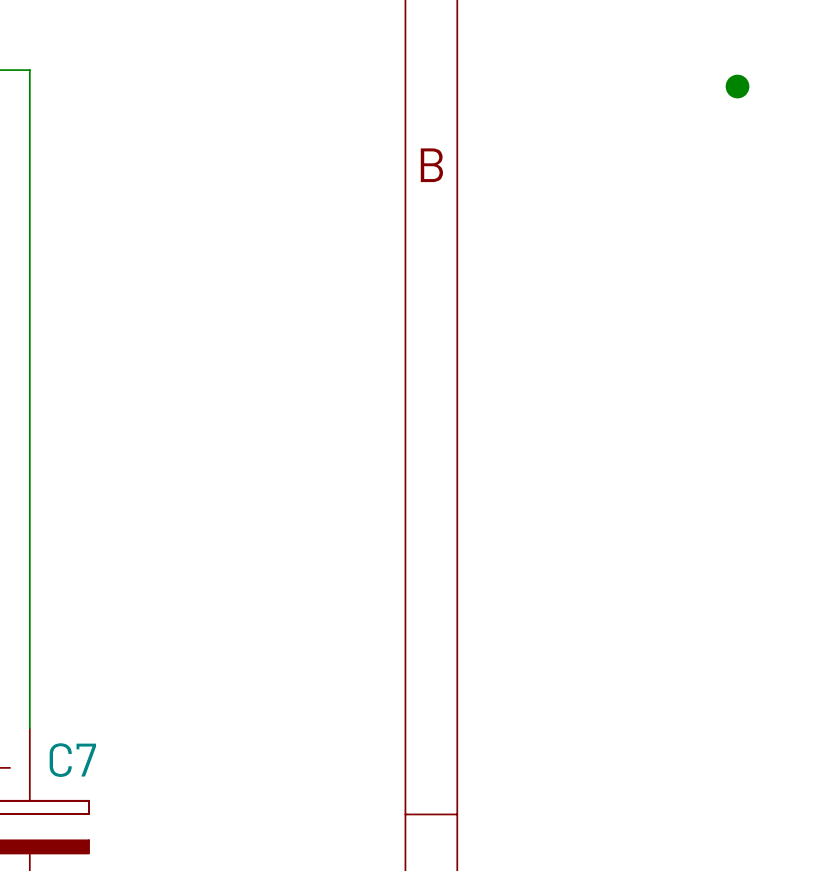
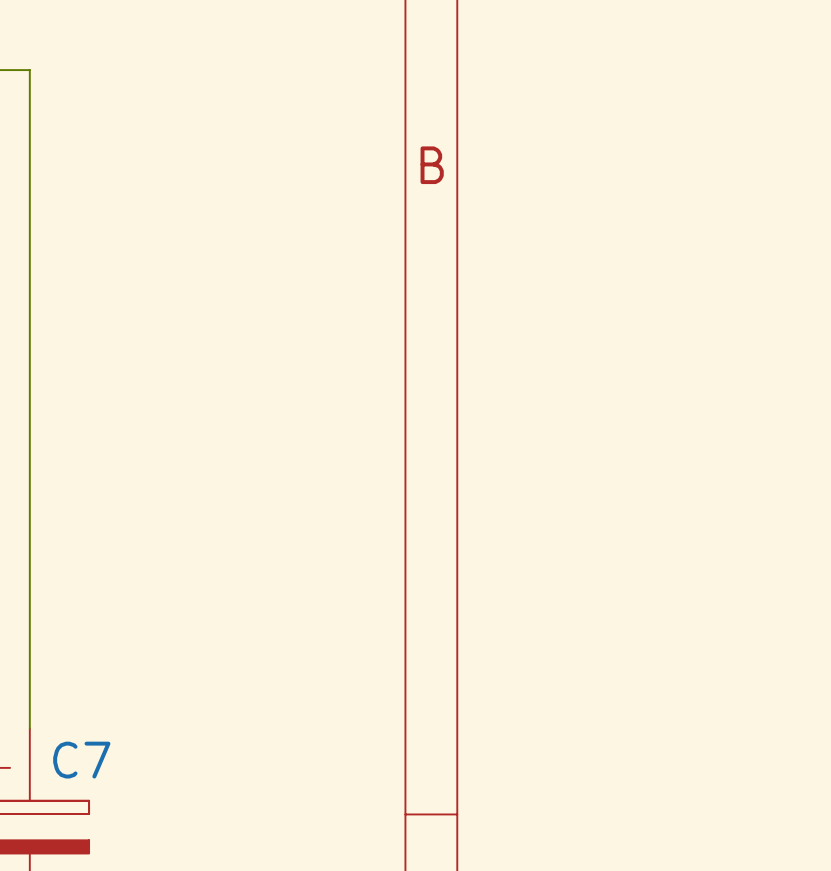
junction: (737, 86) -> none

